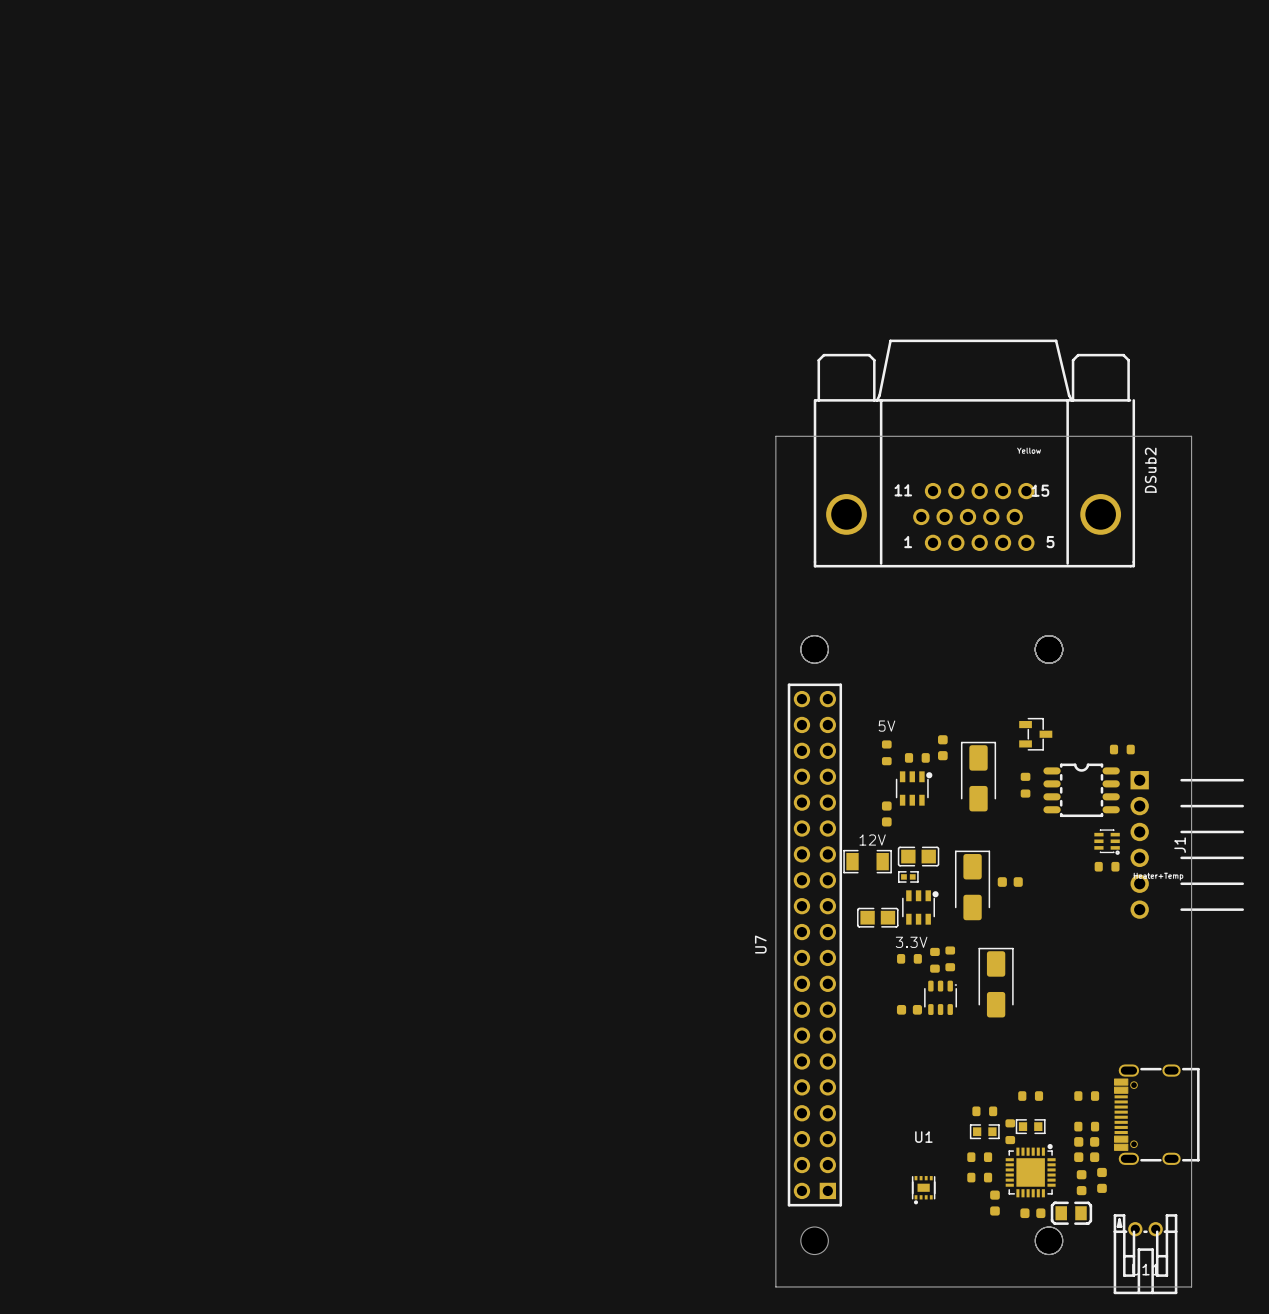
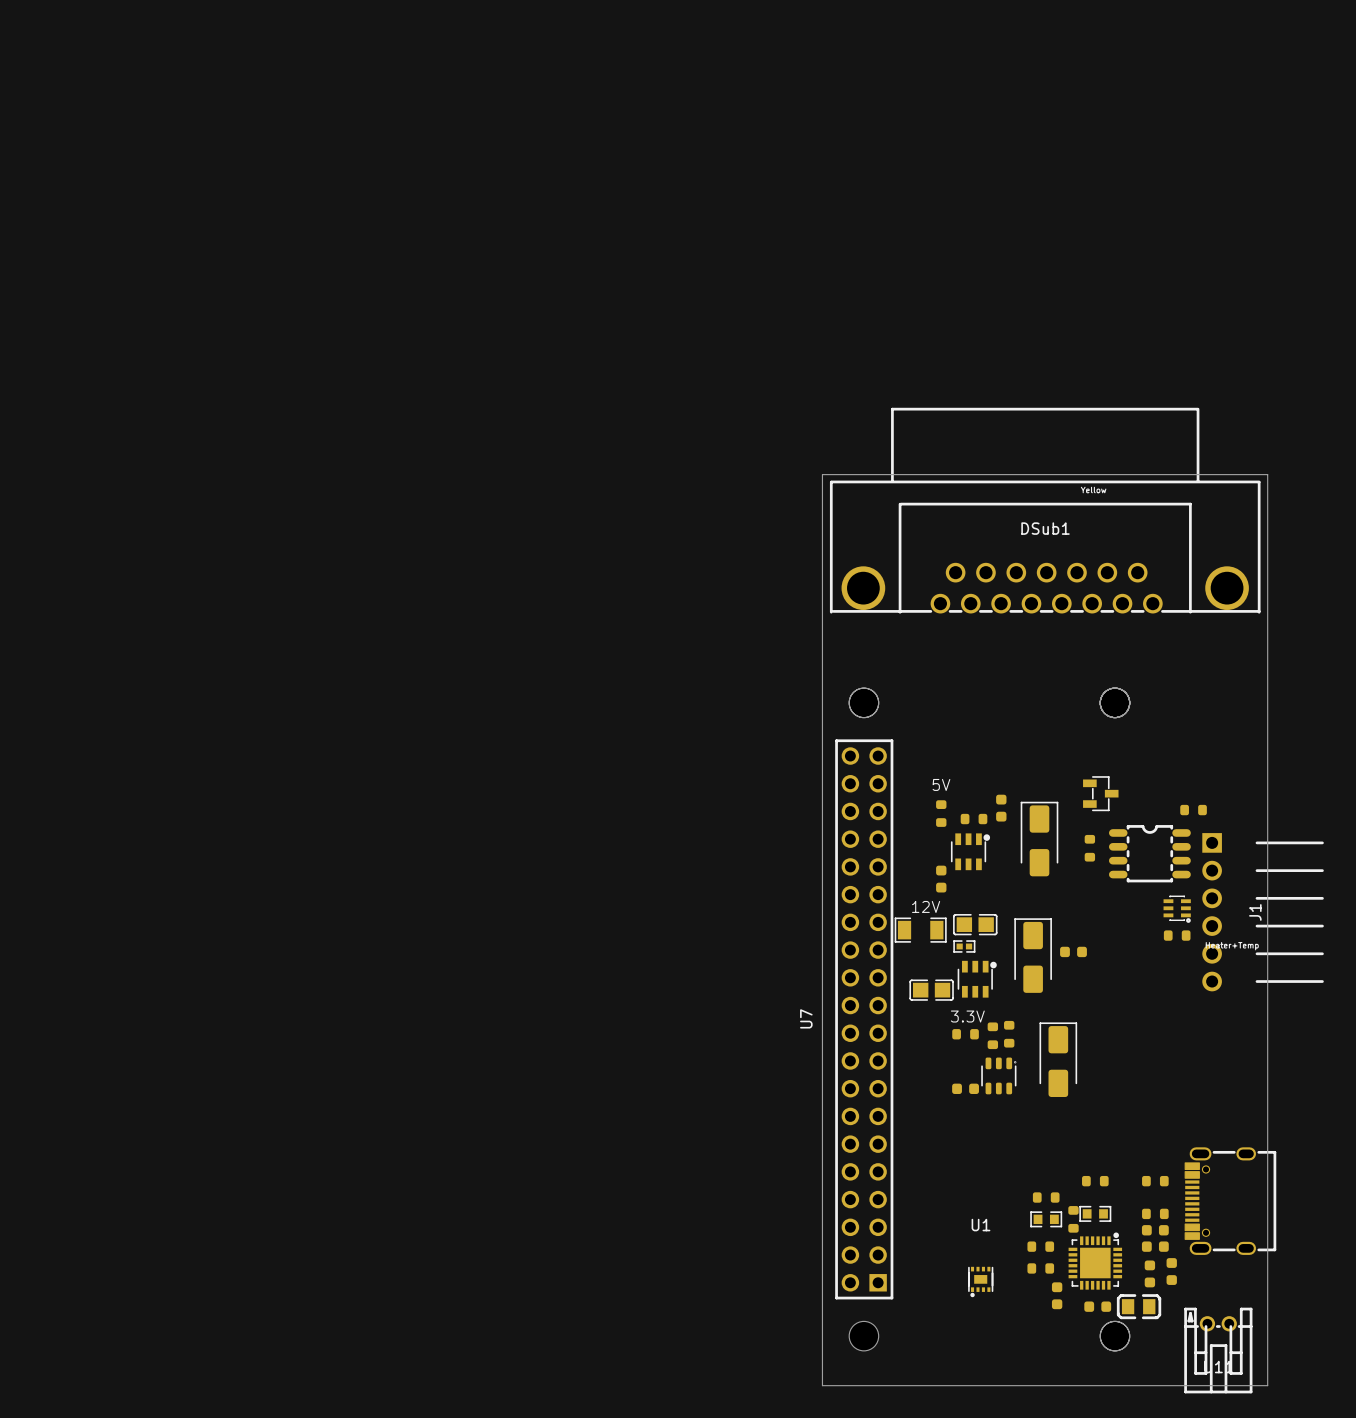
DSub2: (974, 453) -> none
DSub1: none -> (1045, 510)

